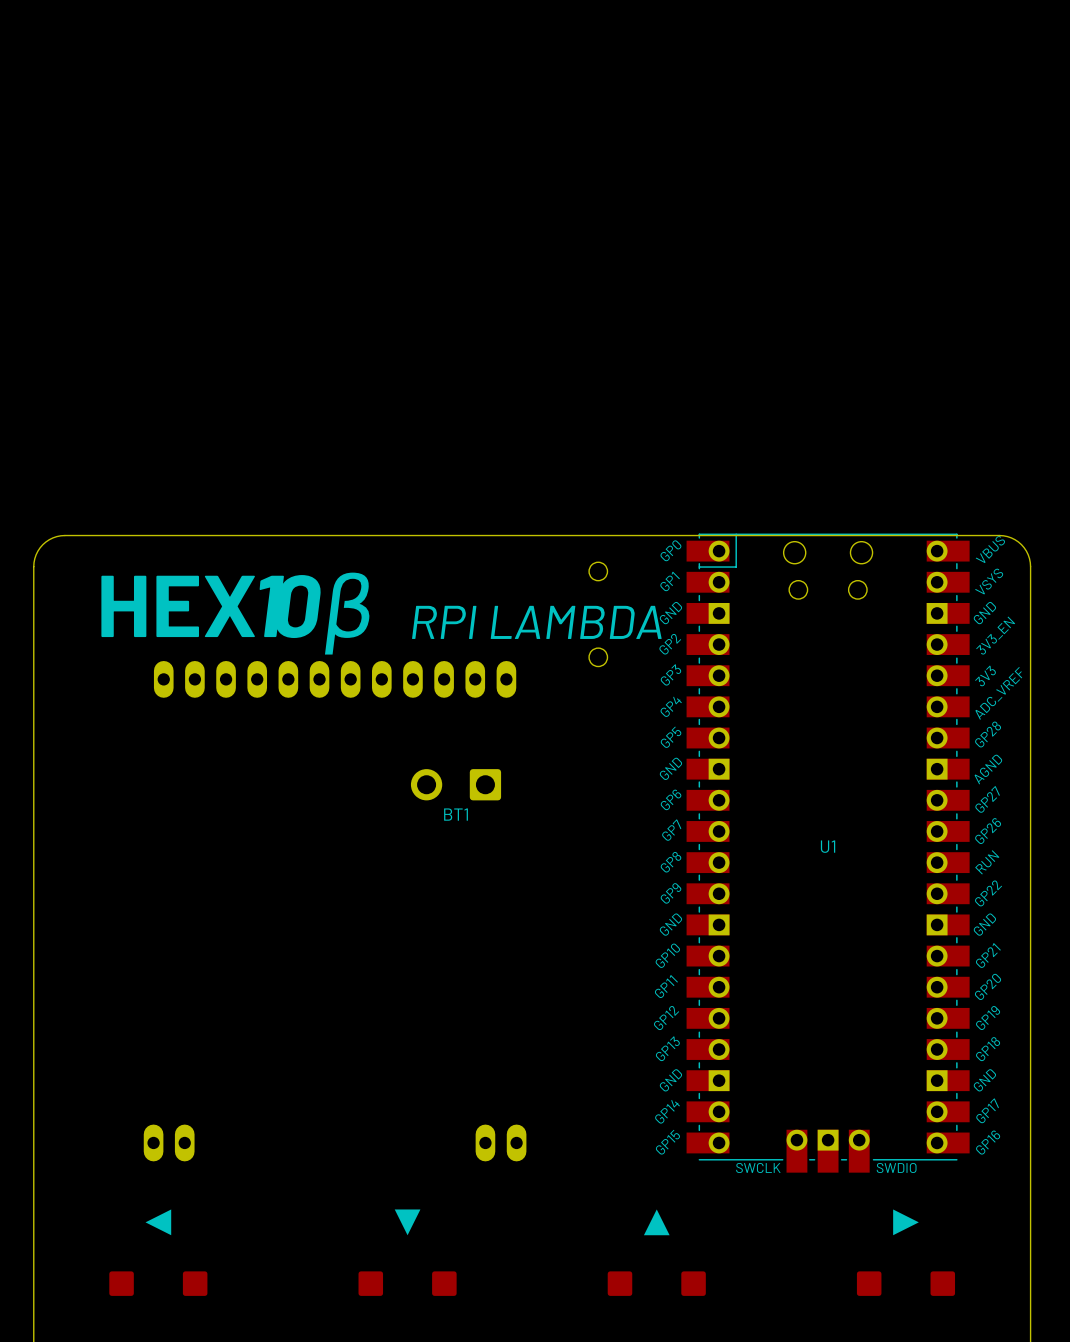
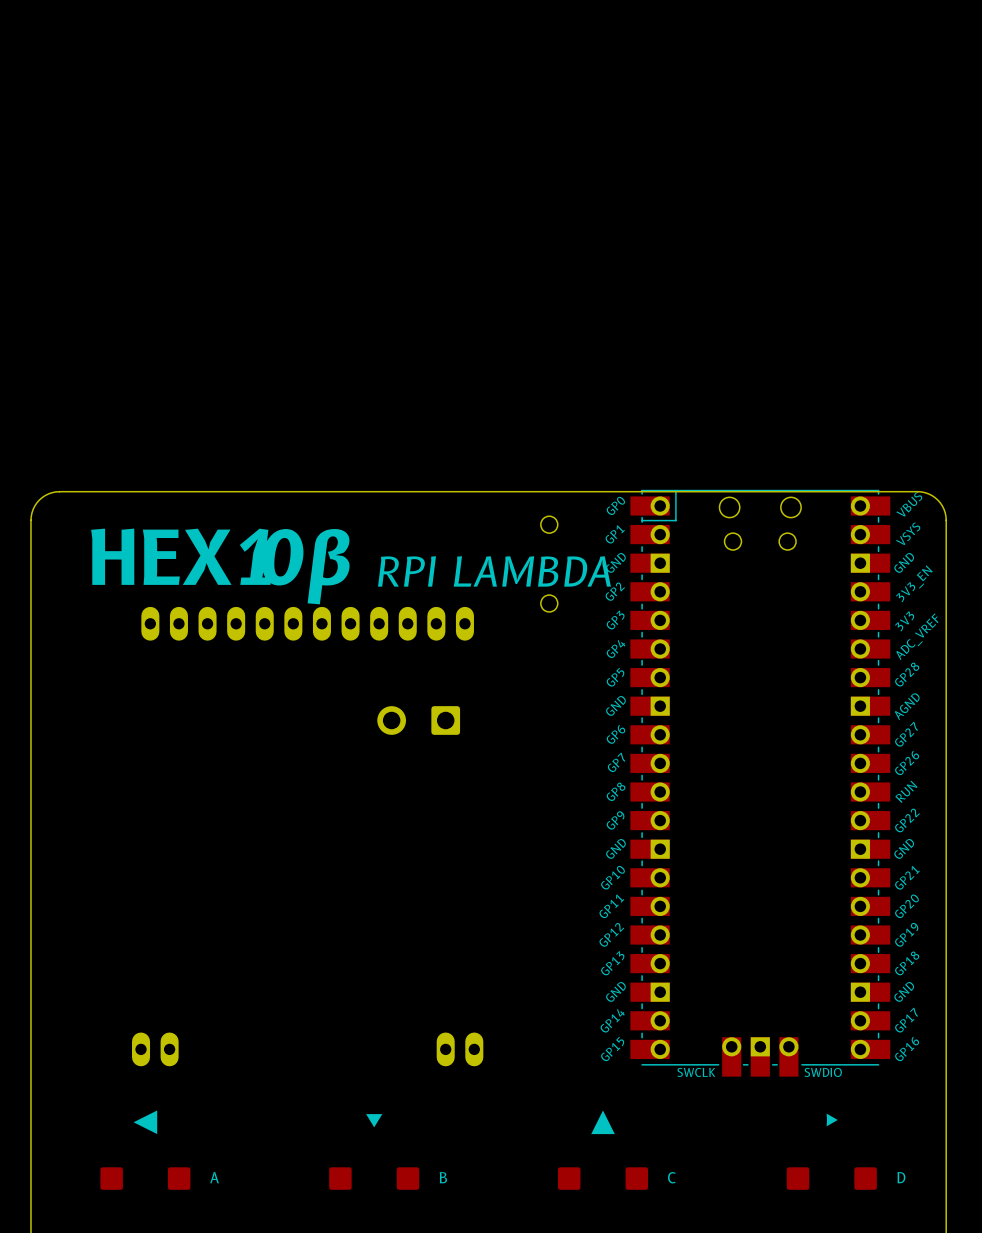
BT1 name: BT1 (456, 814) -> none
U1 name: U1 (828, 846) -> none
text: none -> A (214, 1177)
text: none -> B (443, 1177)
text: none -> C (671, 1177)
text: none -> D (901, 1177)

